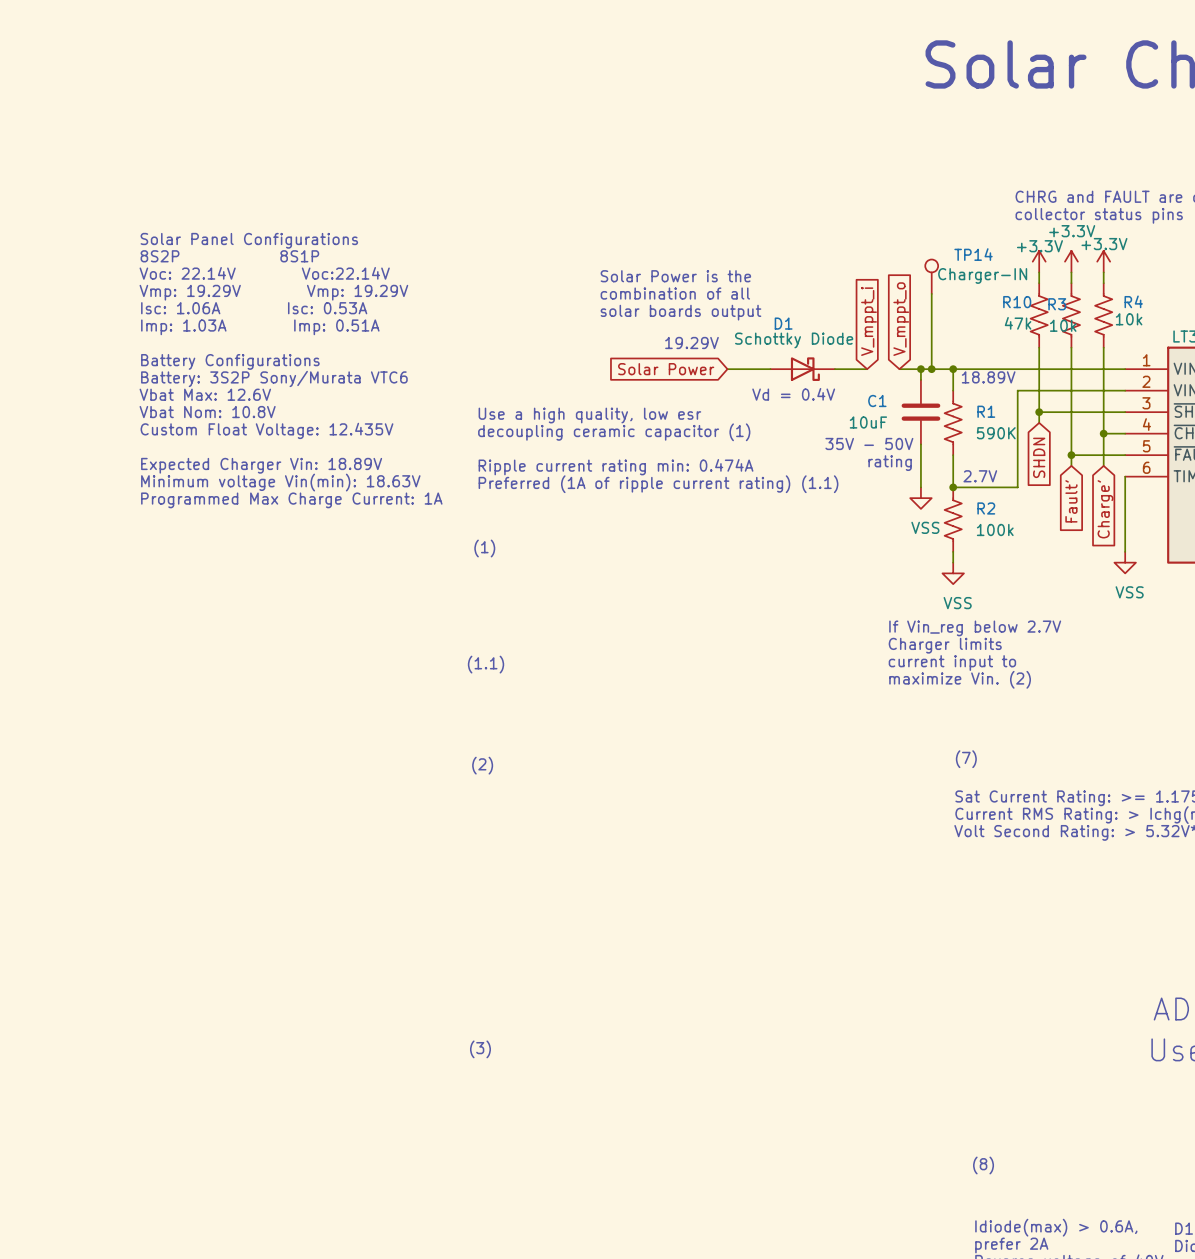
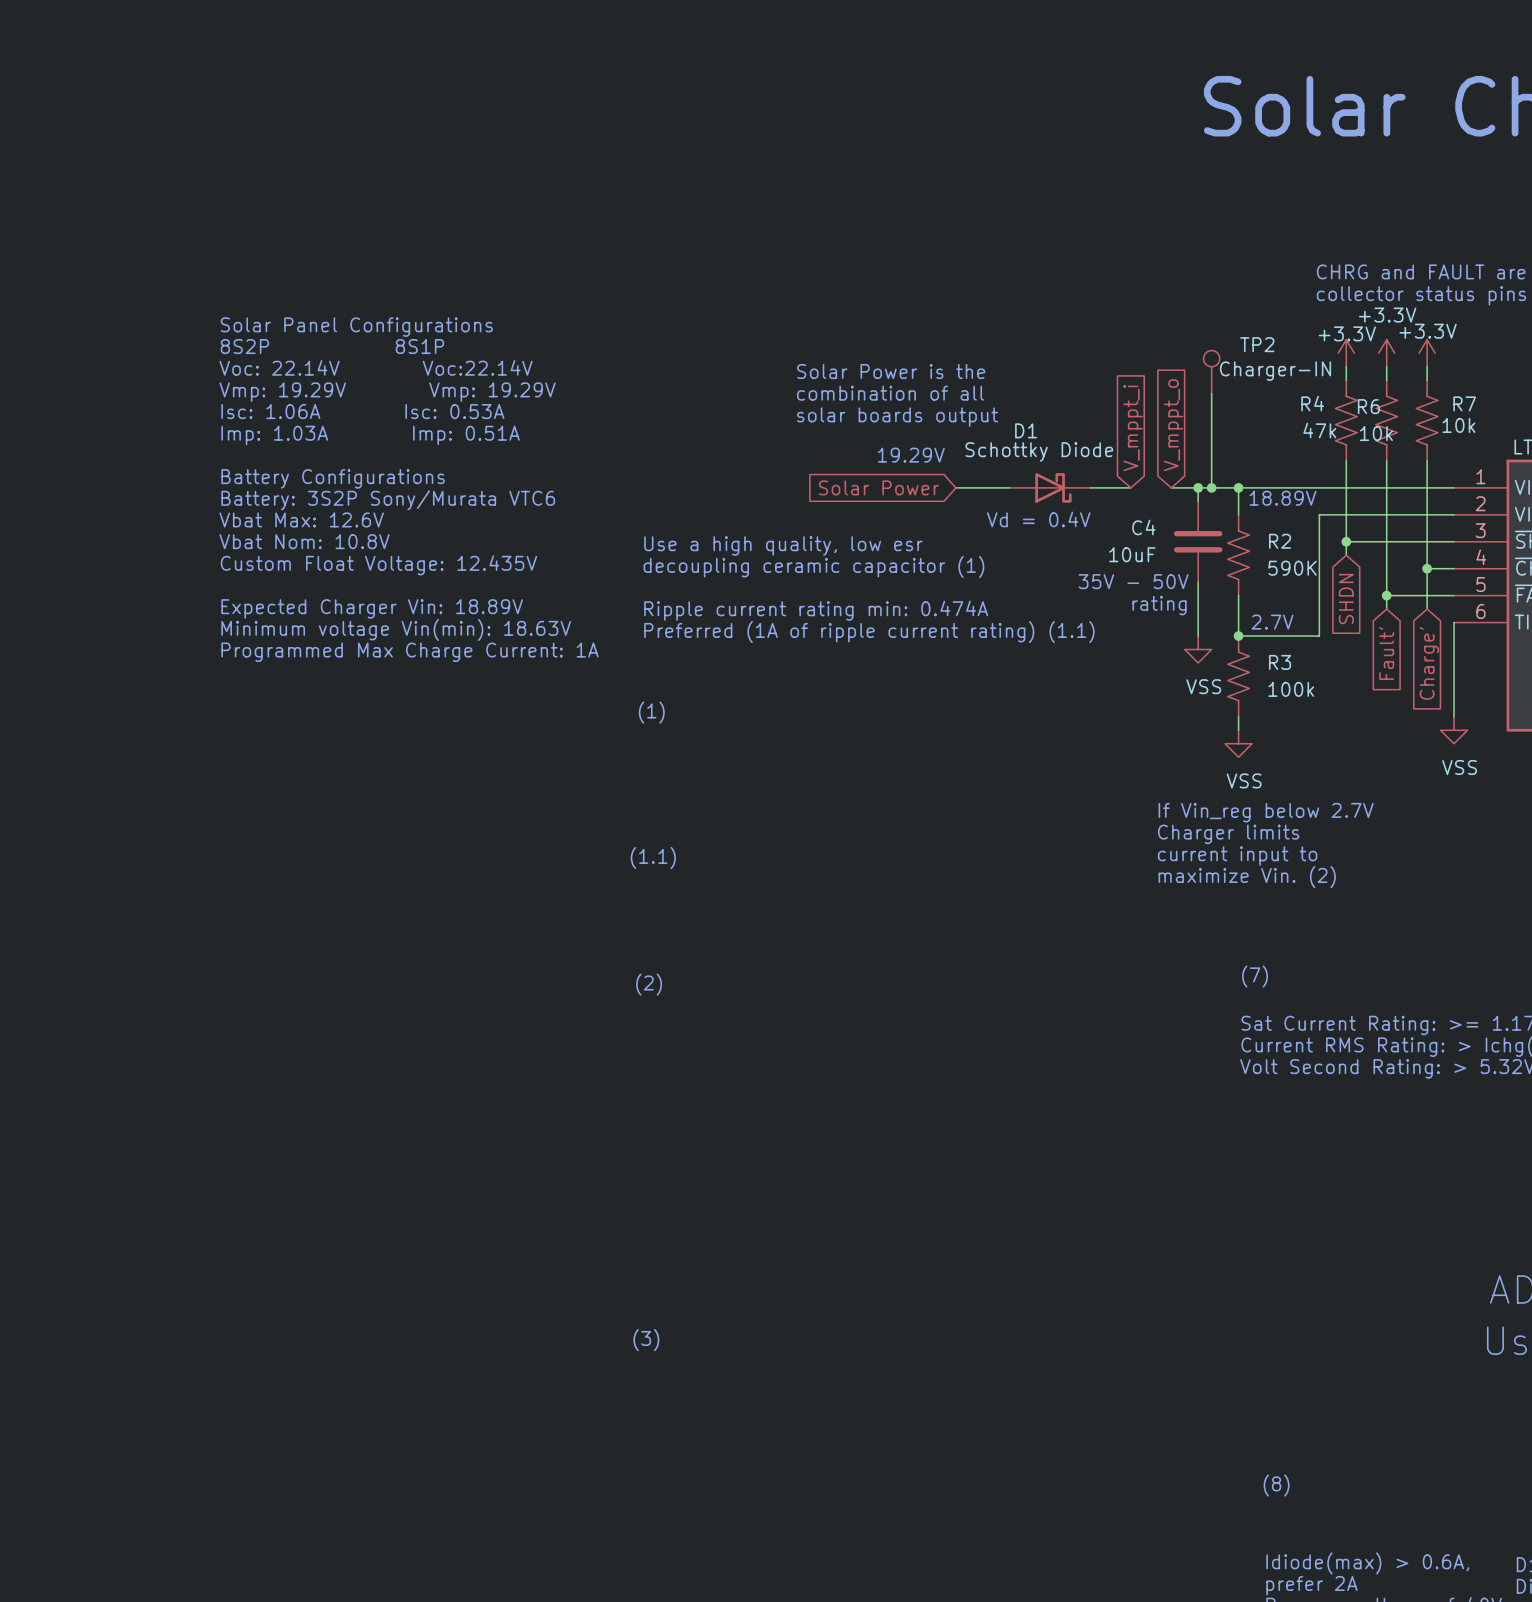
TP14 name: TP14 (973, 254) -> TP2 (1257, 344)
R4 name: R4 (1133, 301) -> R7 (1464, 403)
R10 name: R10 (1017, 302) -> R4 (1312, 403)
R3 name: R3 (1057, 304) -> R6 (1368, 406)
C1 name: C1 (877, 401) -> C4 (1143, 527)
R1 name: R1 (986, 411) -> R2 (1280, 541)
R2 name: R2 (986, 508) -> R3 (1280, 662)

